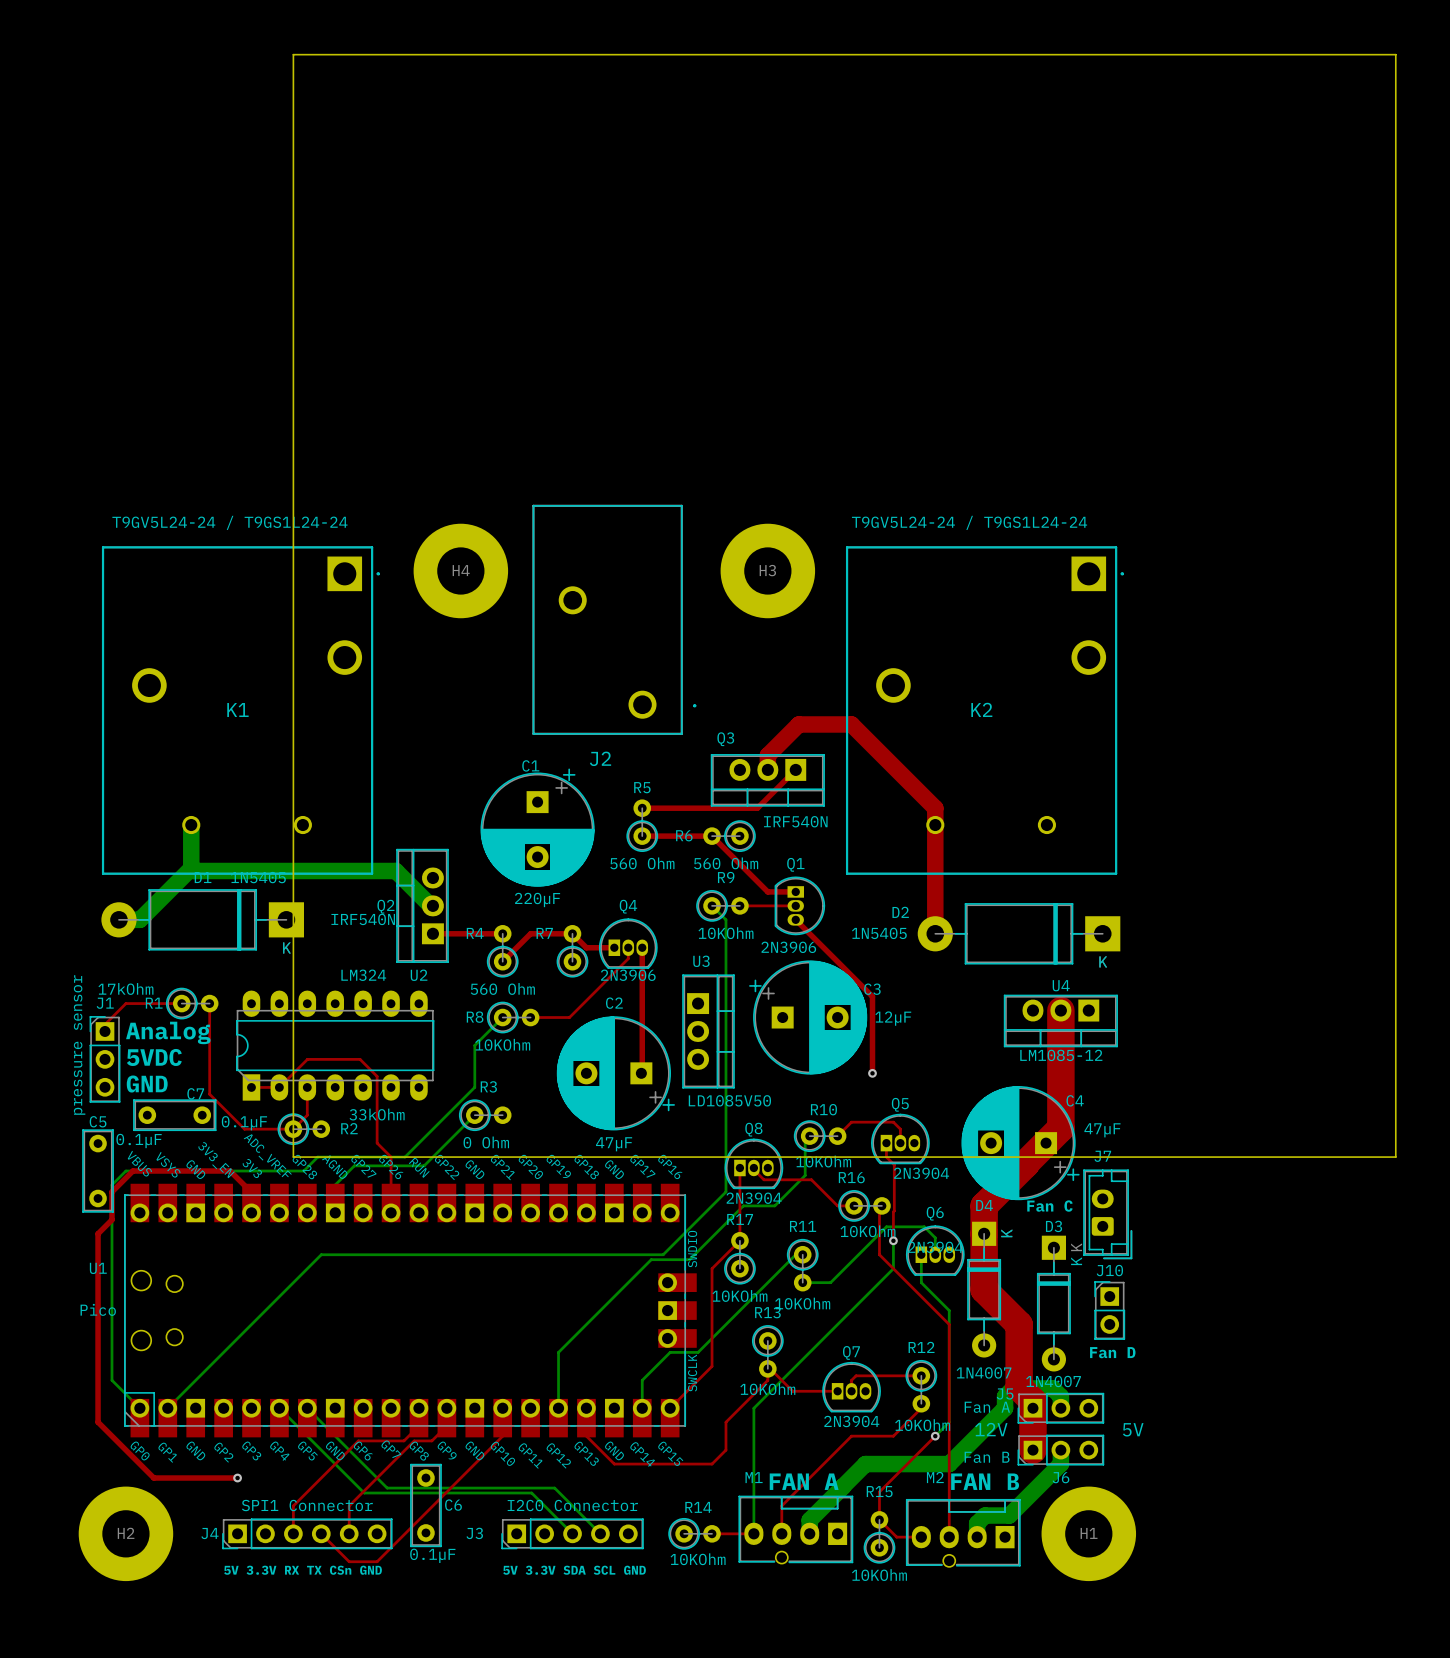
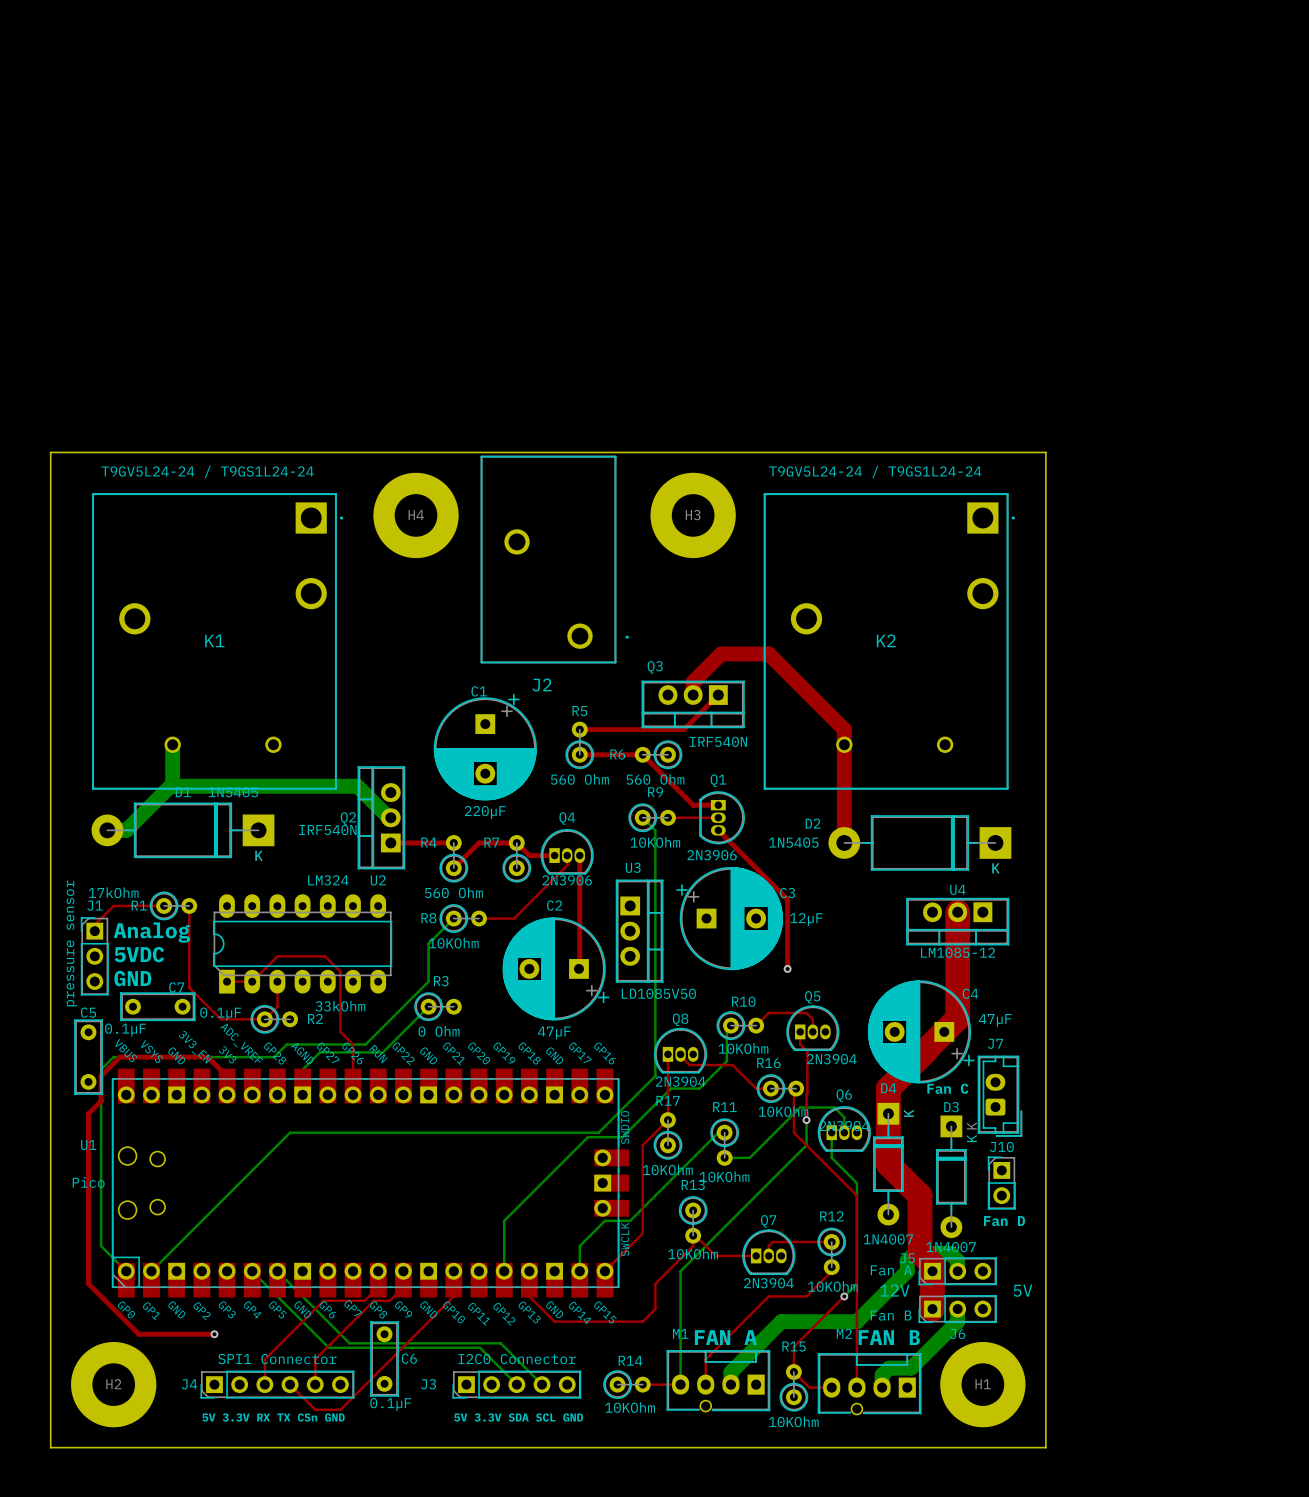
board edge: (293, 54) (1395, 54) (1395, 1157) (293, 1157) (293, 54) -> none
board edge: none -> (50, 452) (1045, 452) (1045, 1447) (50, 1447) (50, 452)

